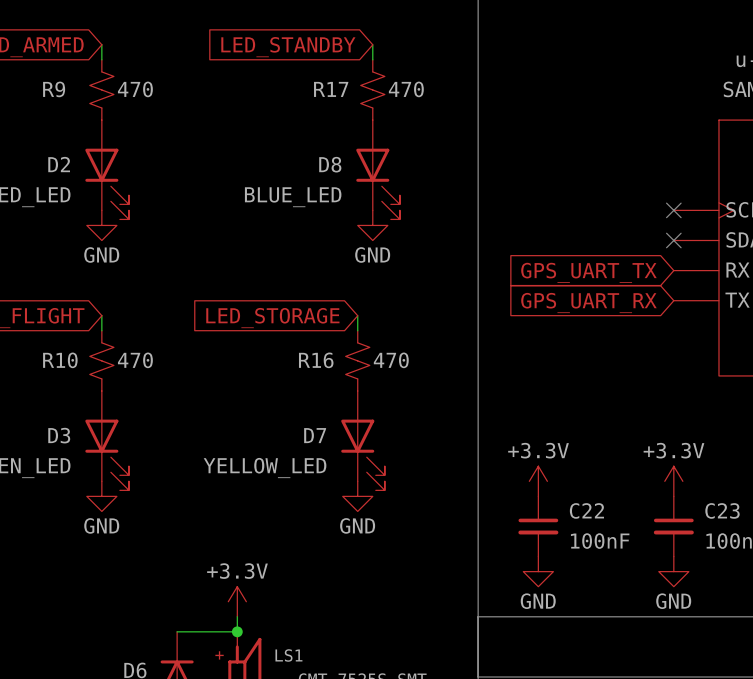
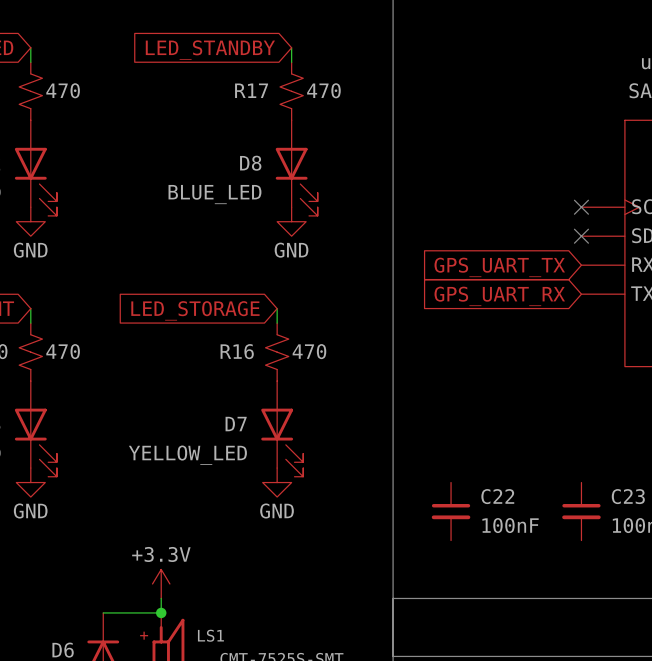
power symbol: +3.3V (538, 481) -> none
power symbol: +3.3V (673, 481) -> none
power symbol: GND (538, 571) -> none
power symbol: GND (673, 571) -> none

